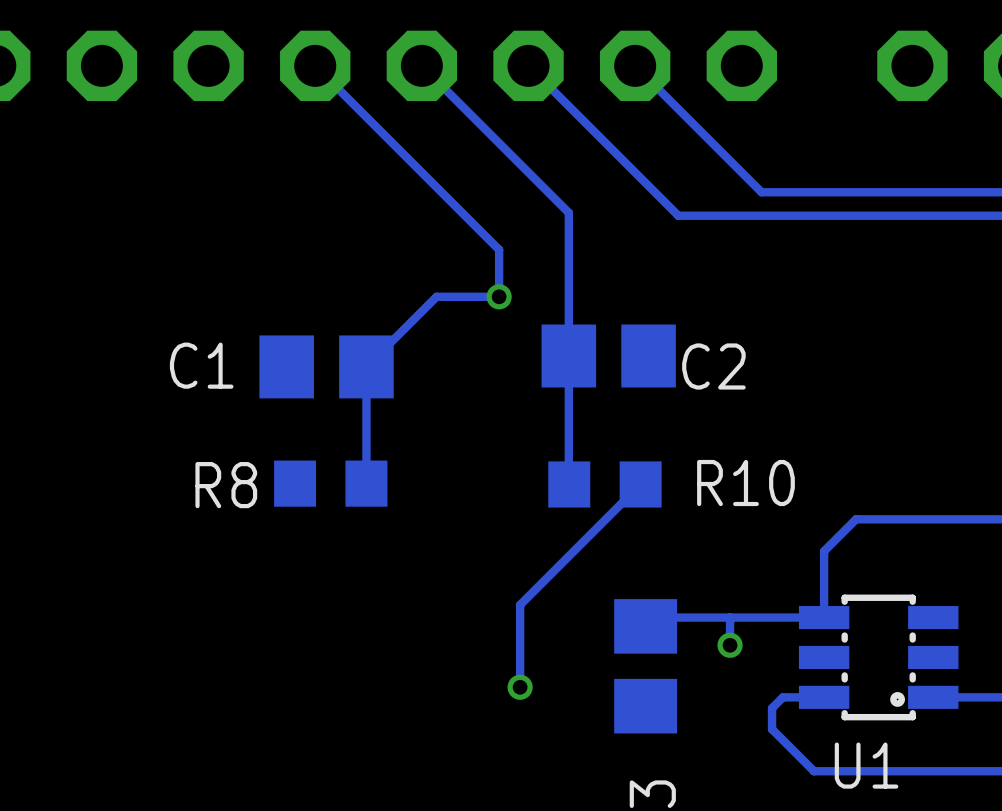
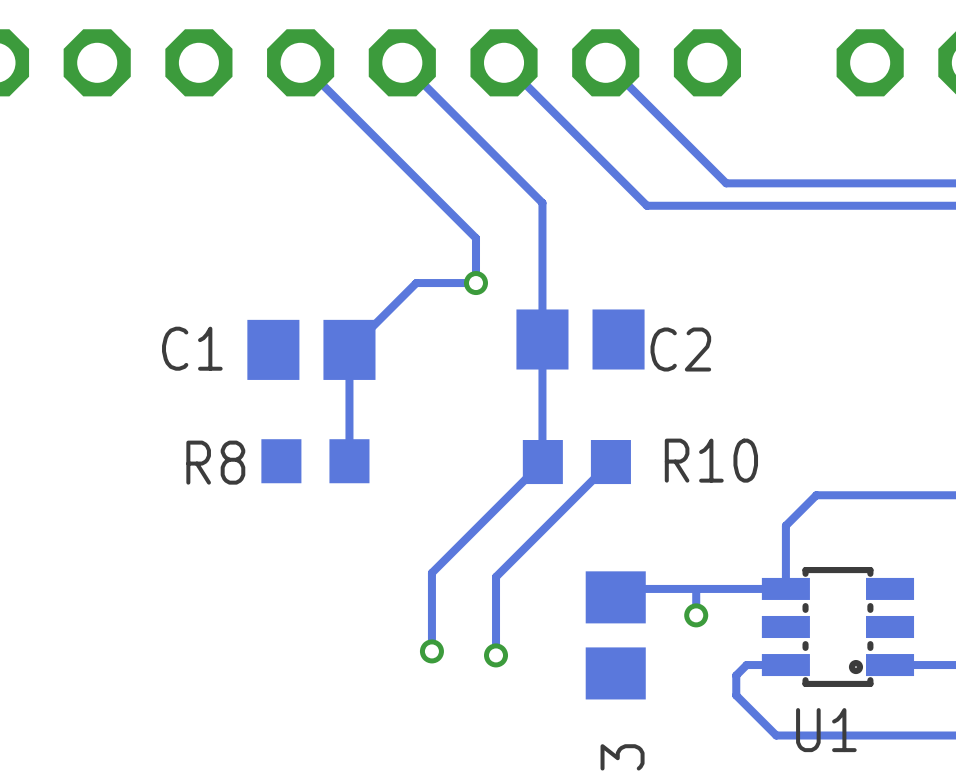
track: none -> (542, 462) (431, 572) (431, 651)
via: none -> (431, 651)

